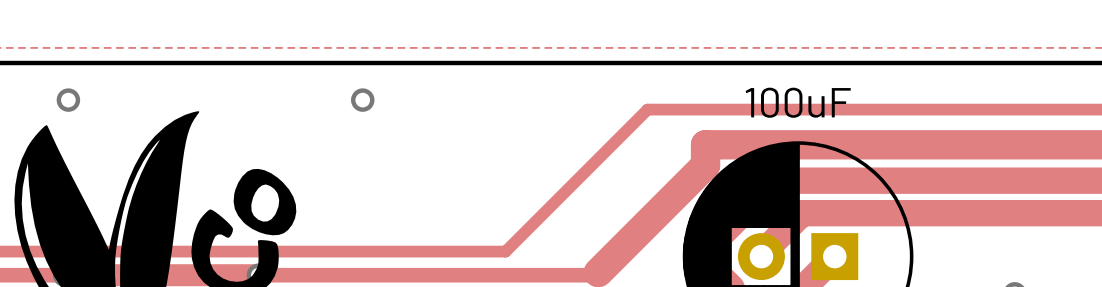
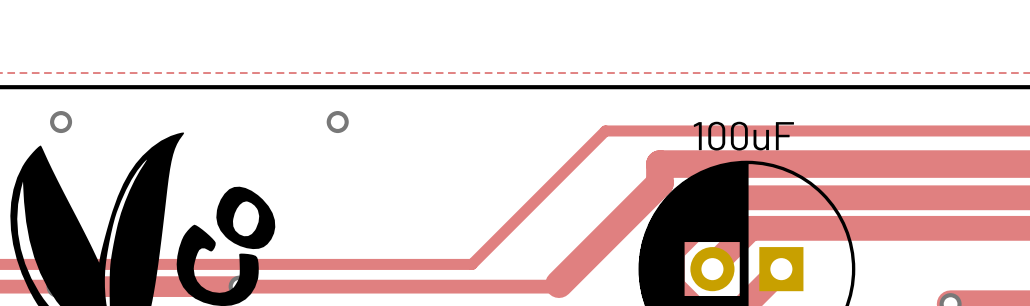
part value: 100uF (798, 102) -> none
text: none -> 100uF (743, 136)

